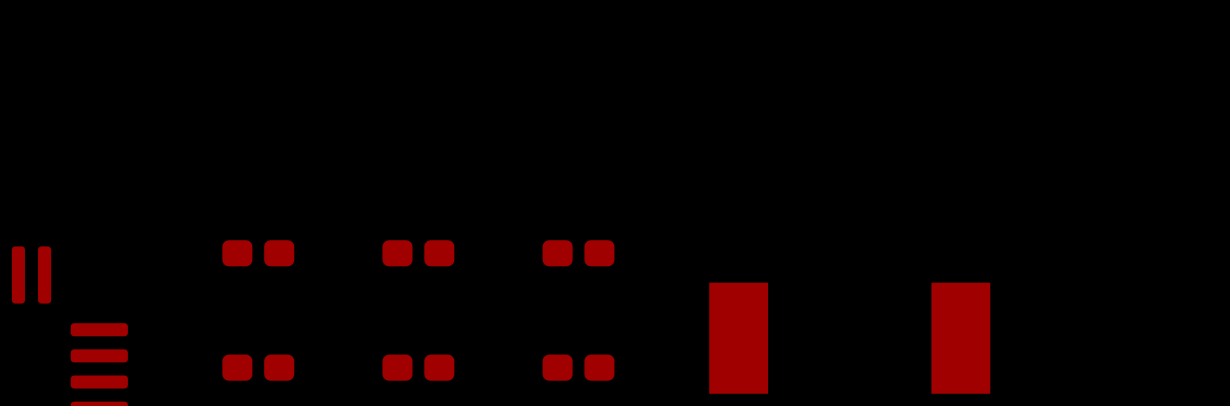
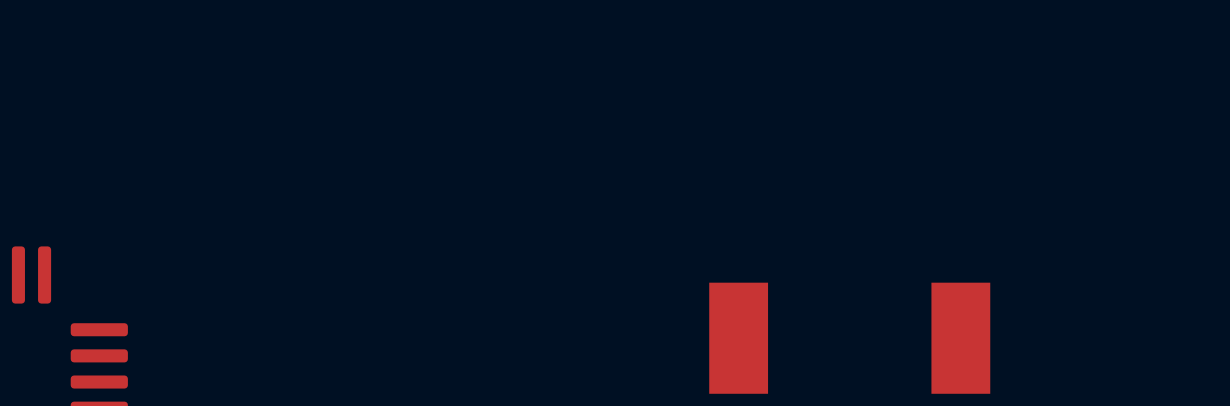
part: (258, 253) -> none
part: (418, 253) -> none
part: (578, 253) -> none
part: (258, 367) -> none
part: (418, 367) -> none
part: (578, 367) -> none

